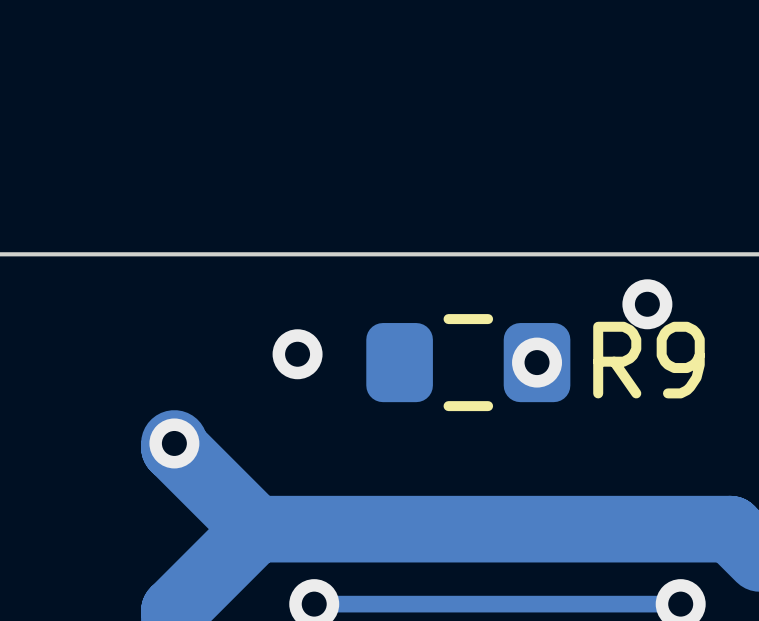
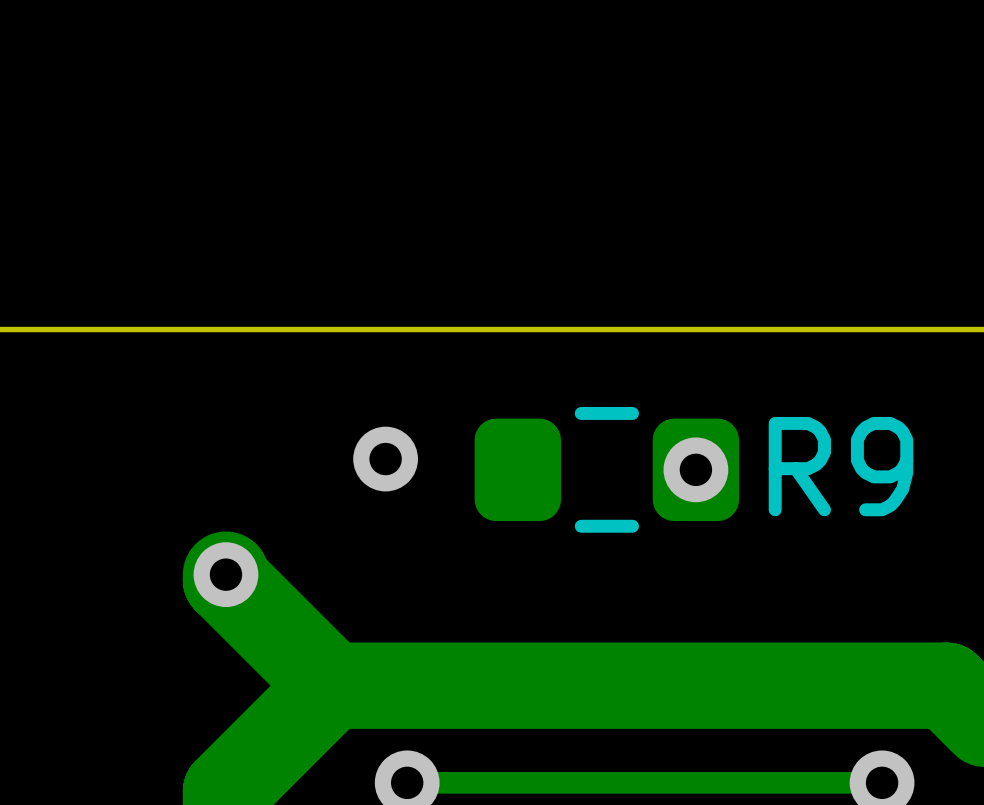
via: (647, 304) -> none

